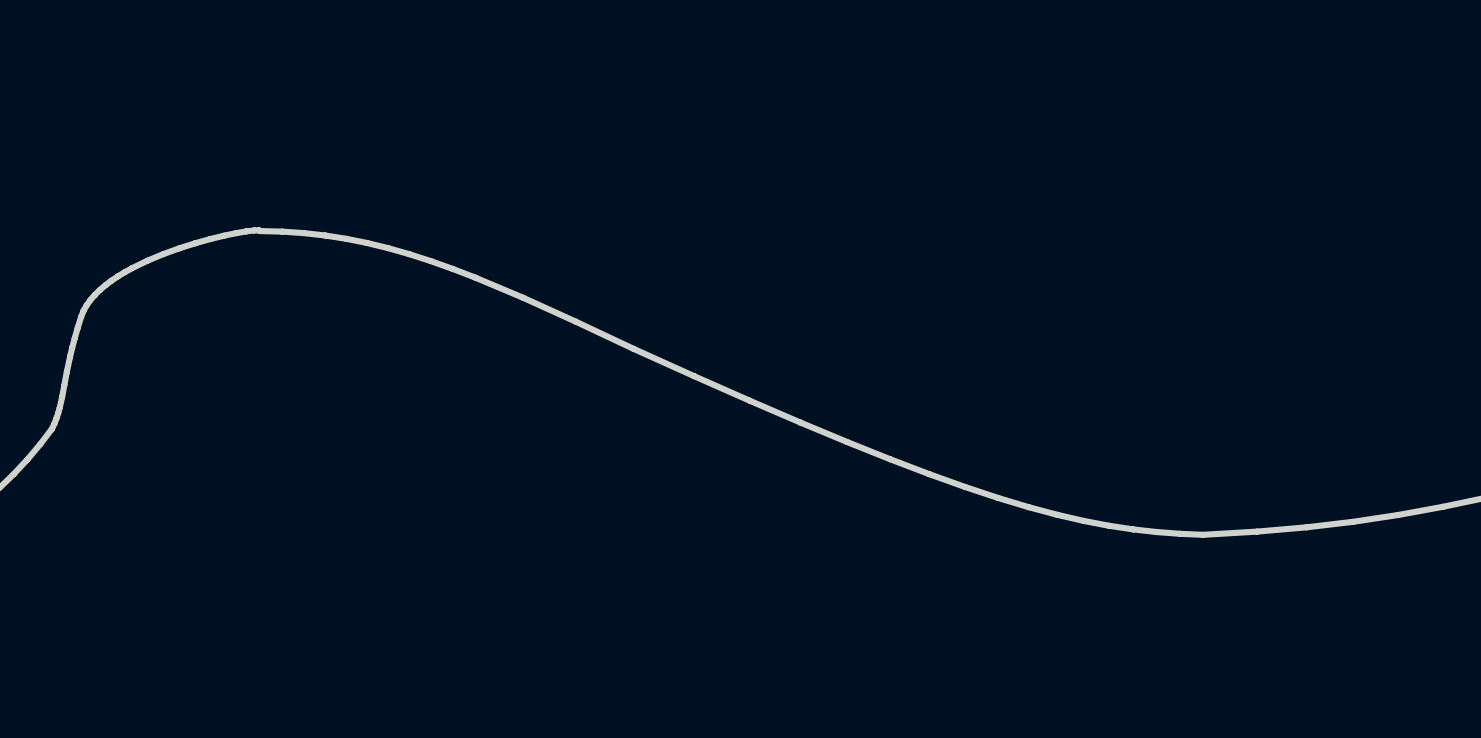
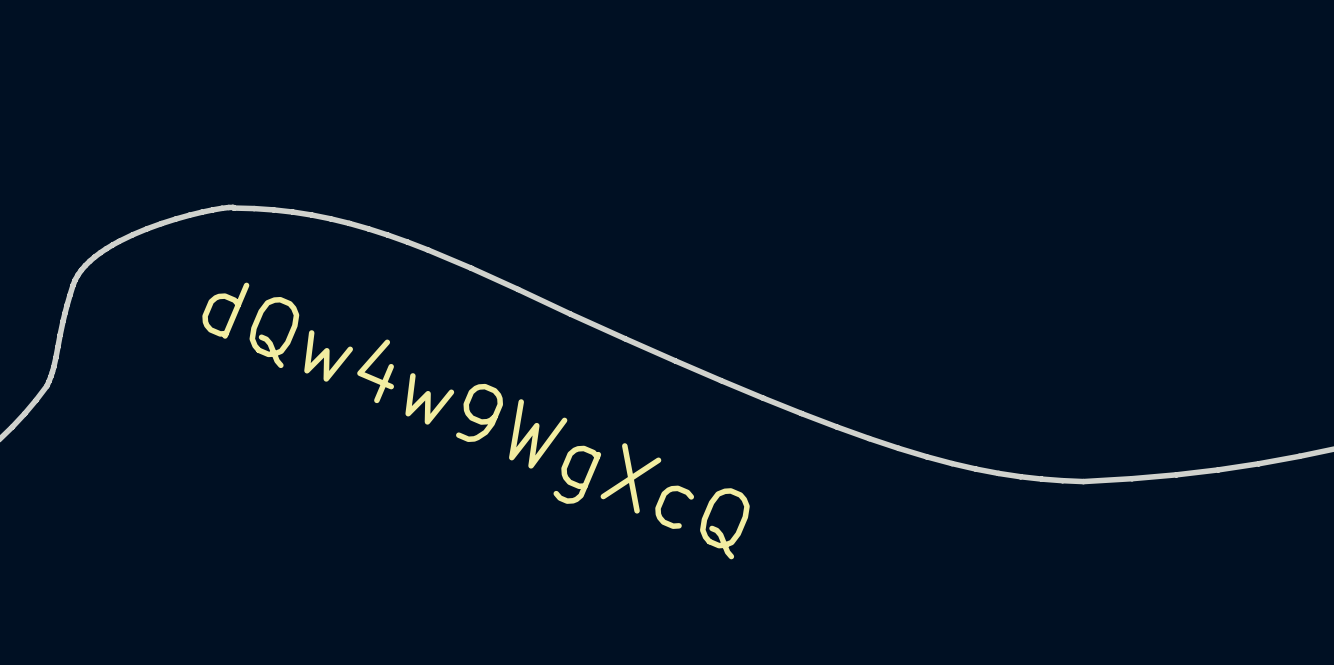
text: none -> dQw4w9WgXcQ (476, 420)

